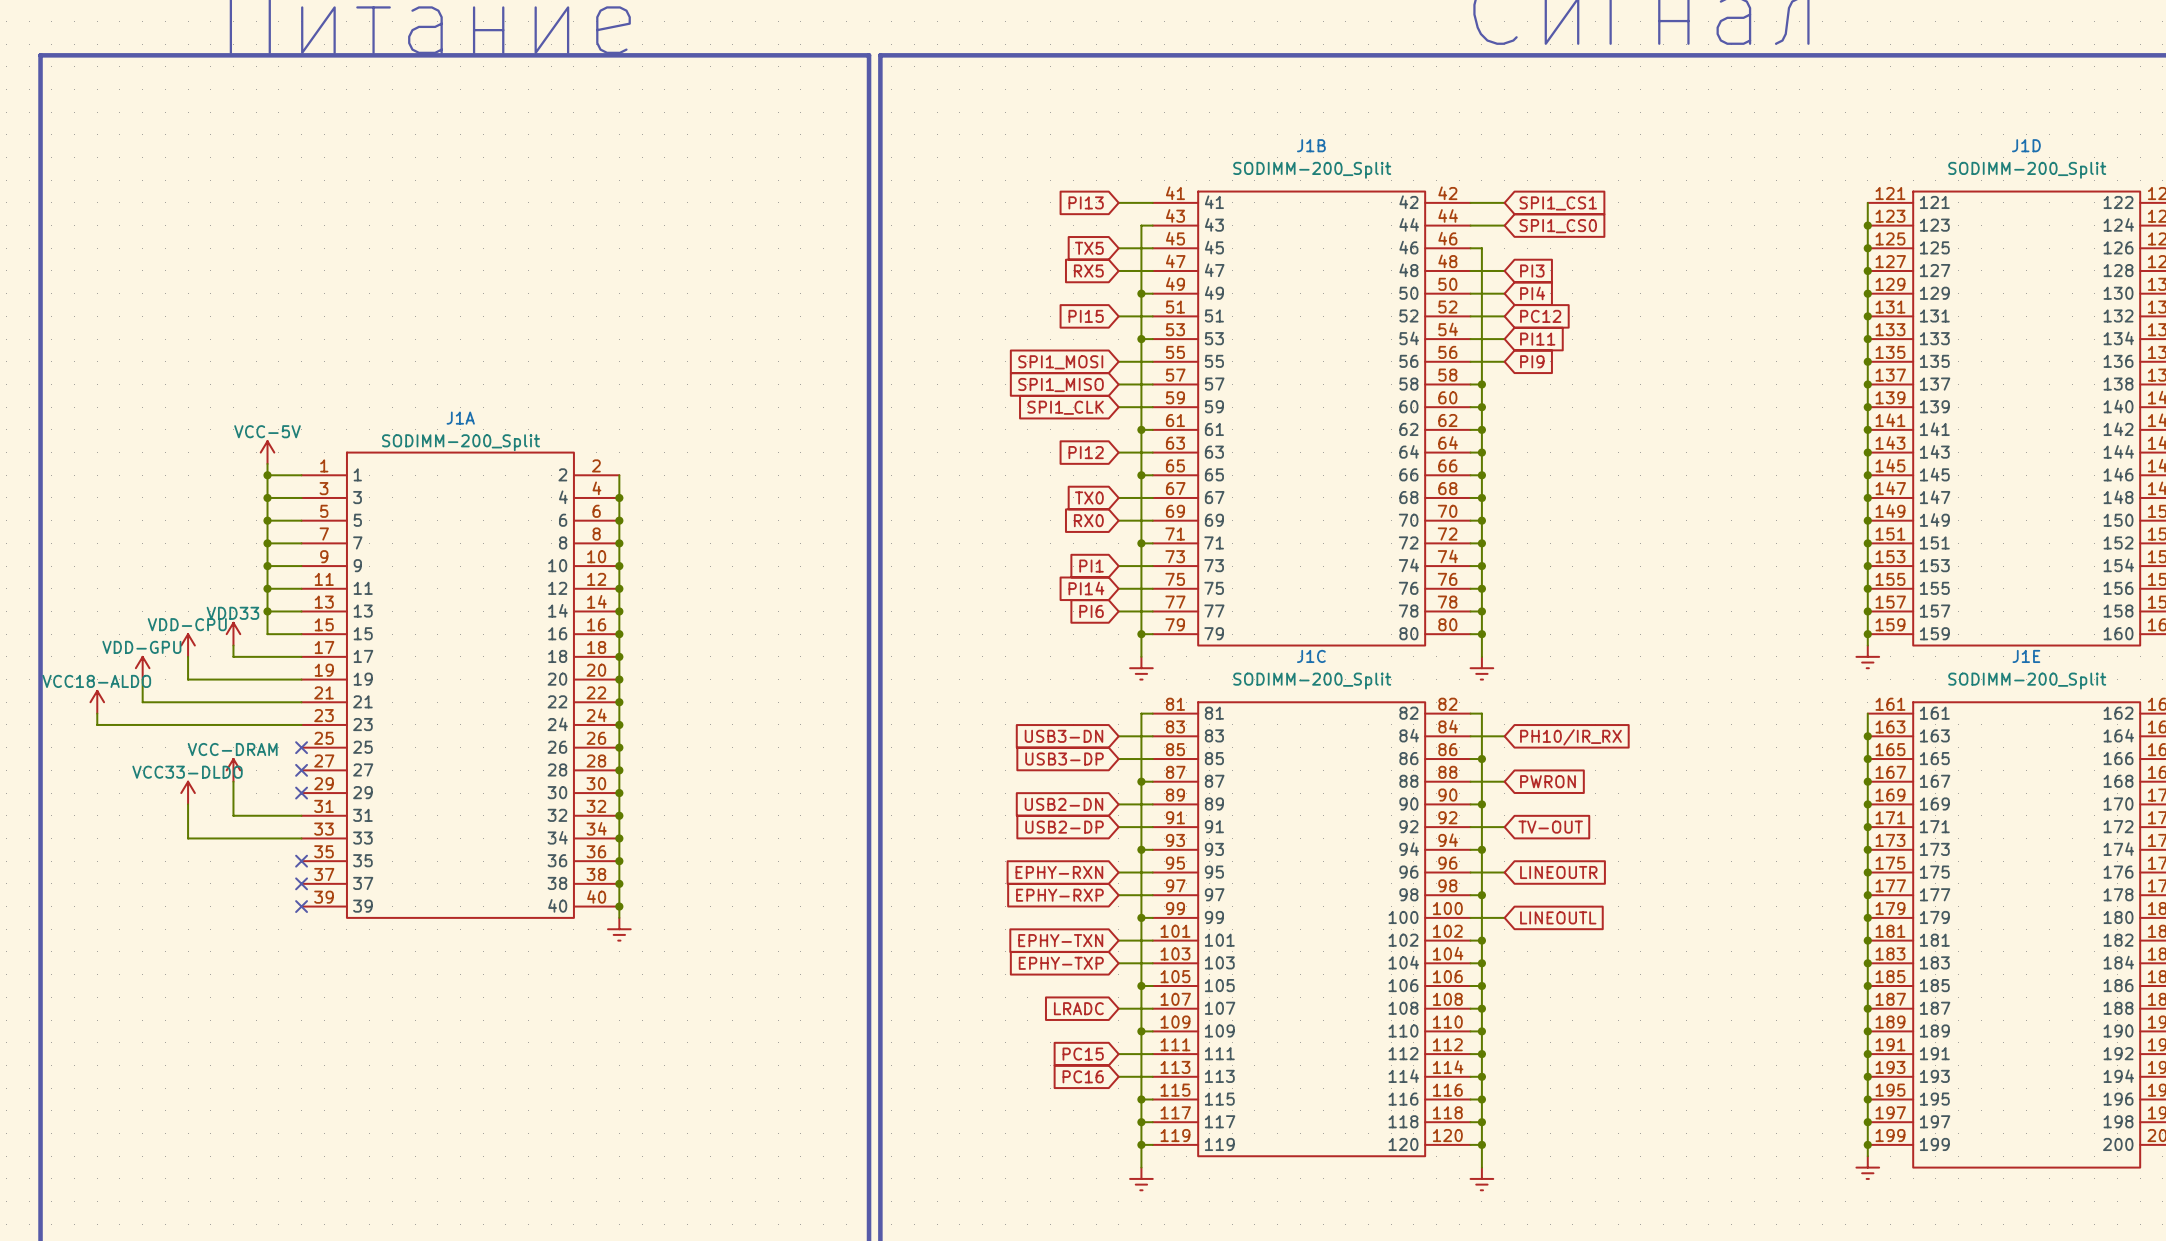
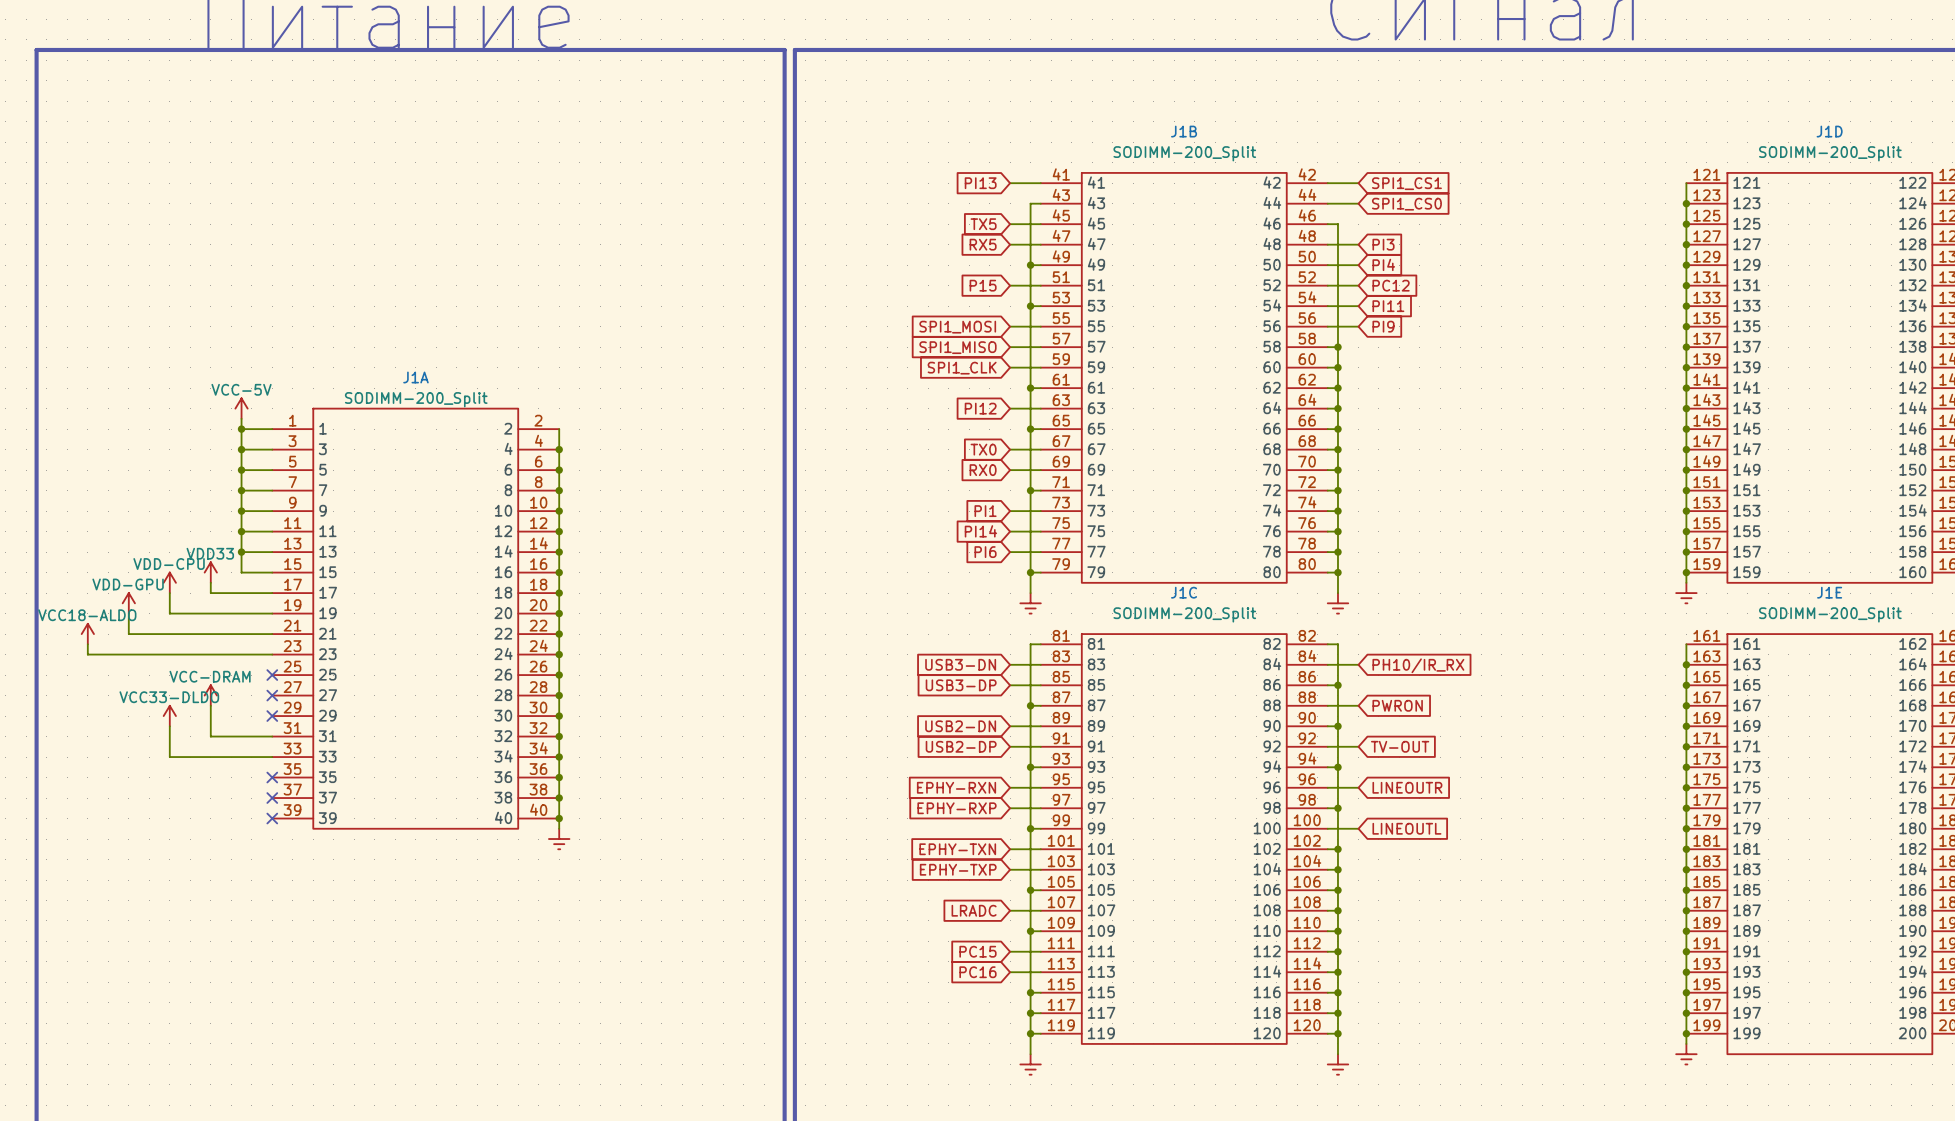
global label: PI15 (1086, 316) -> P15 (983, 285)

